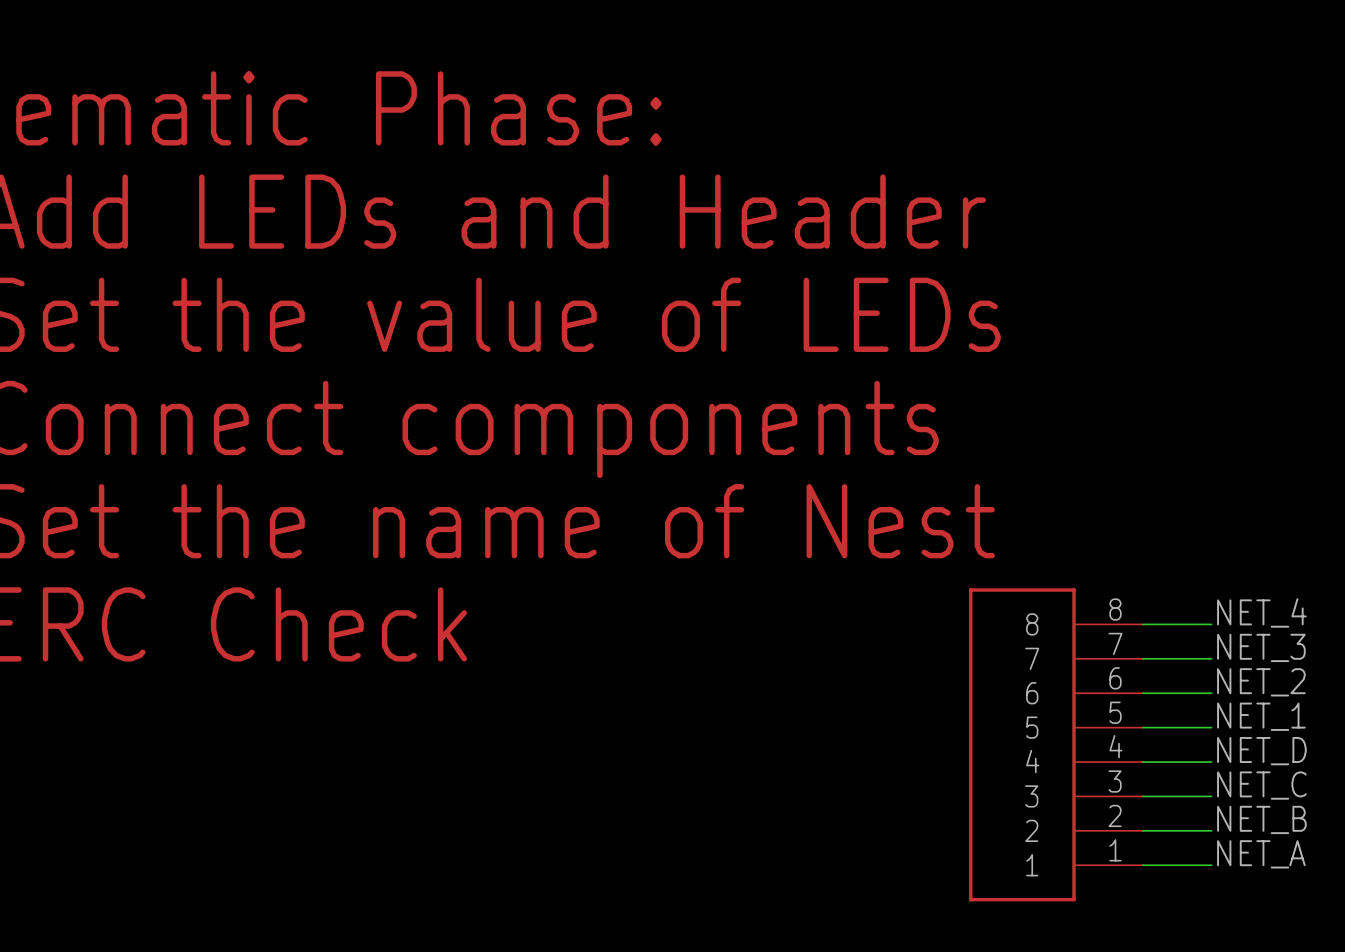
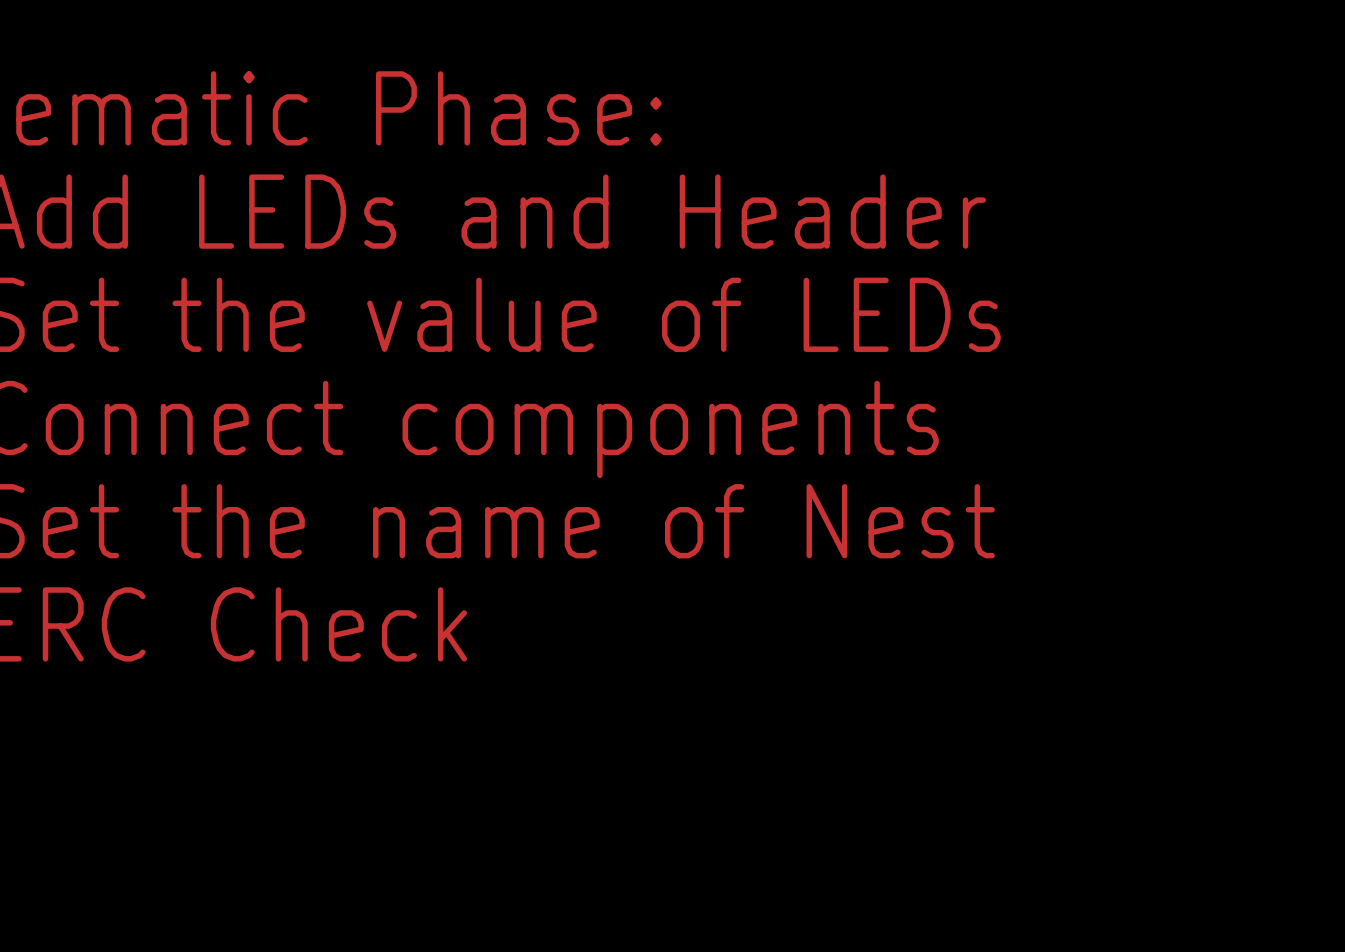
label: NET_4 (1261, 612) -> none
wire: (1142, 624) (1211, 624) -> none
label: NET_3 (1261, 647) -> none
wire: (1142, 658) (1211, 658) -> none
label: NET_2 (1261, 682) -> none
wire: (1142, 693) (1211, 693) -> none
label: NET_1 (1261, 716) -> none
wire: (1142, 727) (1211, 727) -> none
part: (1055, 744) -> none
label: NET_D (1261, 751) -> none
wire: (1142, 762) (1211, 762) -> none
label: NET_C (1261, 785) -> none
wire: (1142, 796) (1211, 796) -> none
label: NET_B (1261, 819) -> none
wire: (1142, 830) (1211, 830) -> none
label: NET_A (1261, 854) -> none
wire: (1142, 865) (1211, 865) -> none

